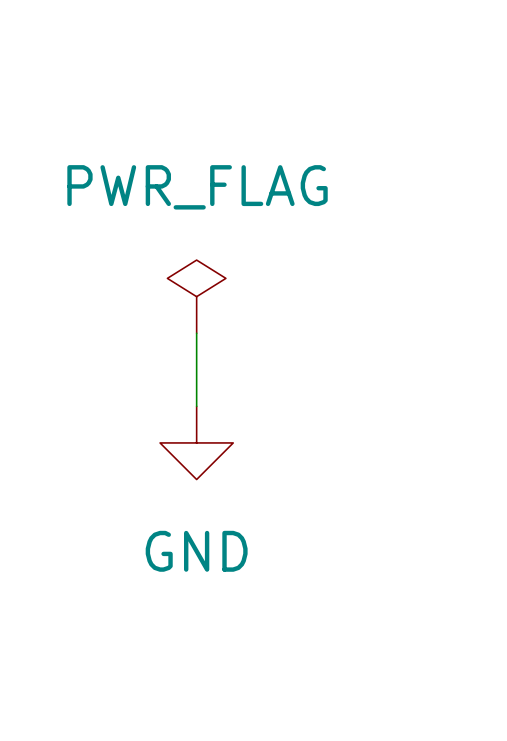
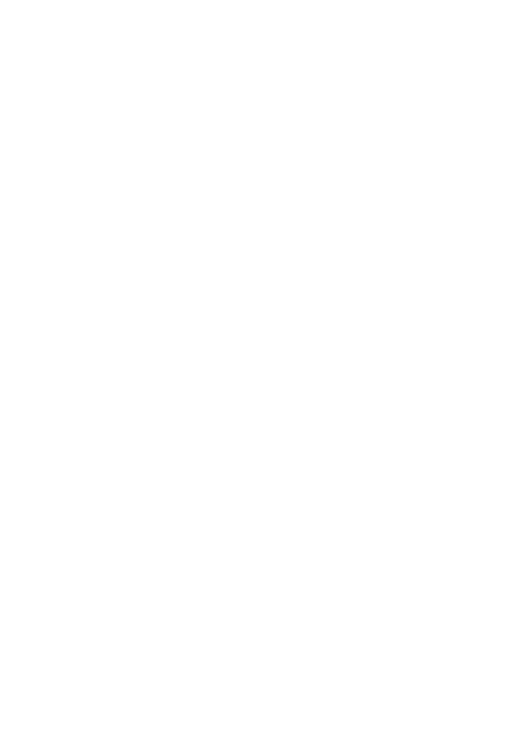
power symbol: PWR_FLAG (196, 296) -> none
wire: (196, 333) (196, 406) -> none
power symbol: GND (196, 442) -> none

